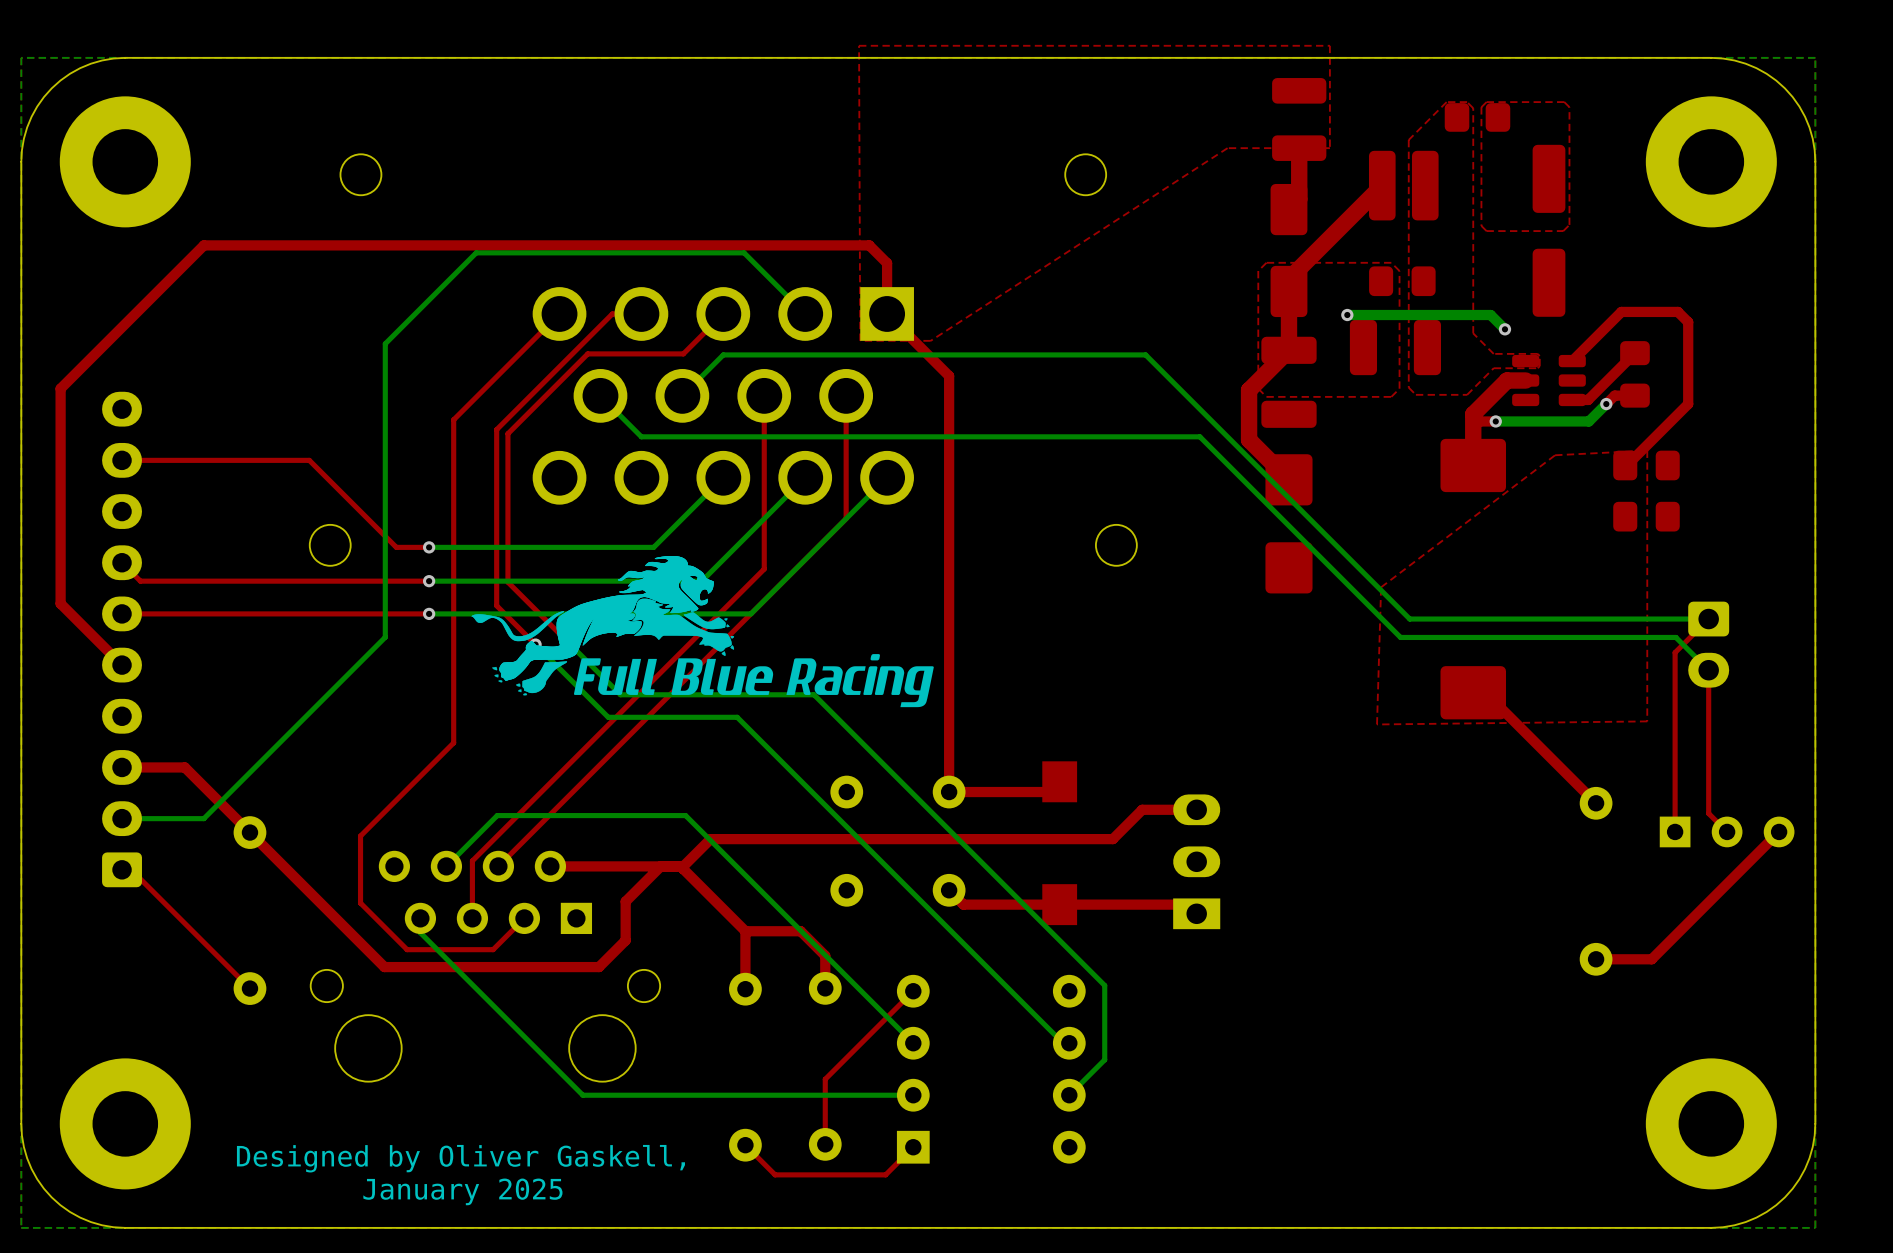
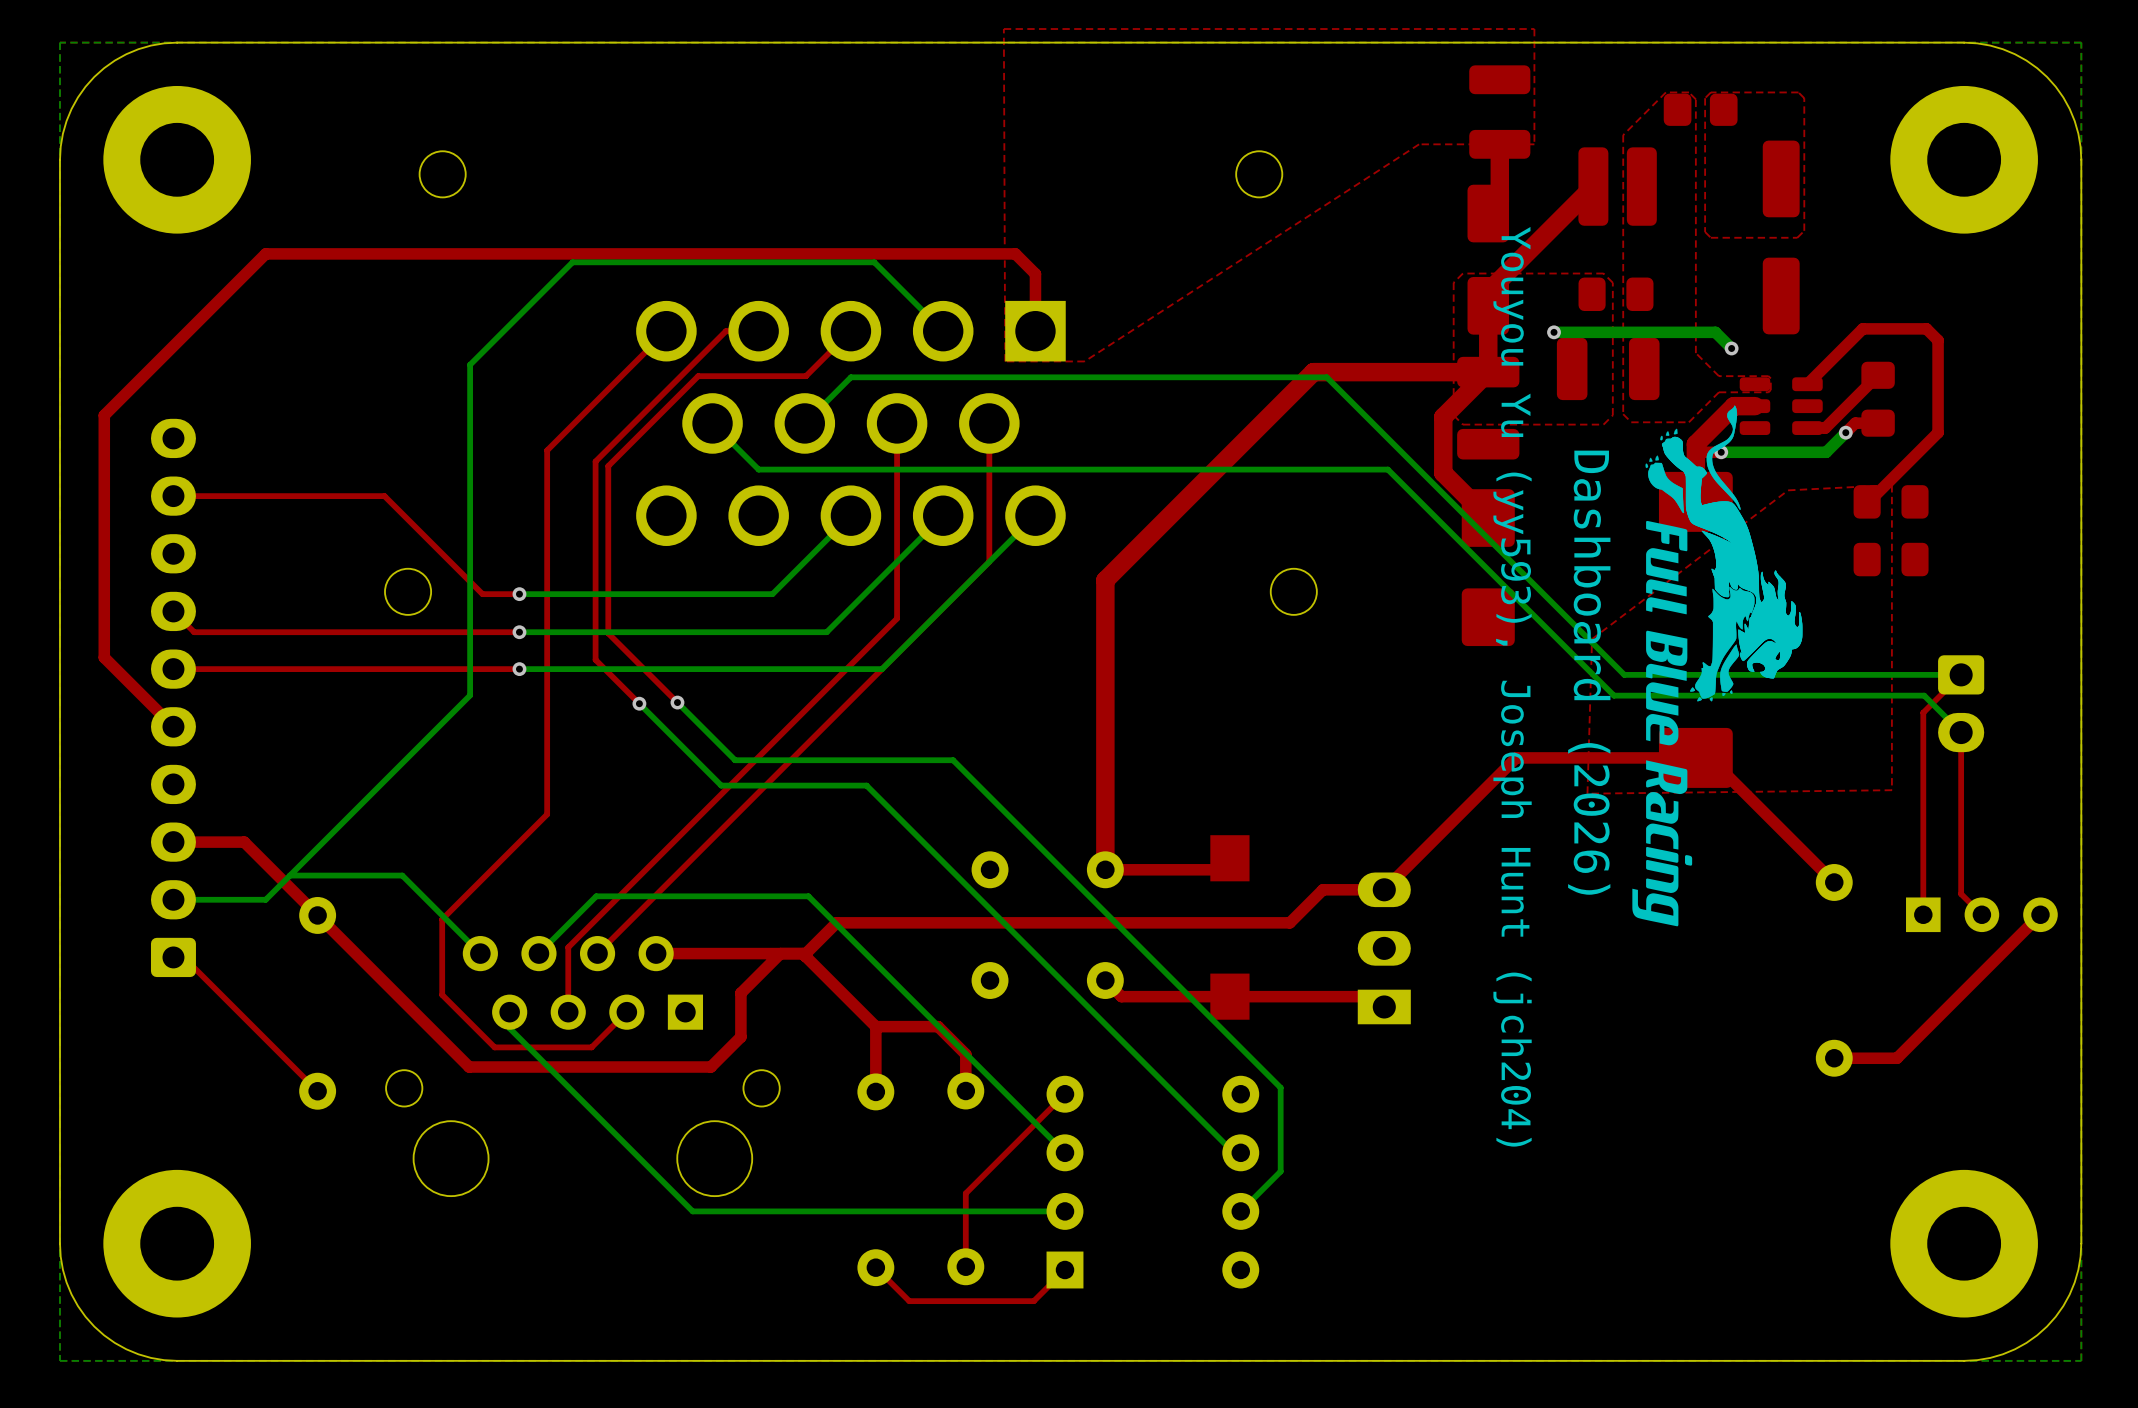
top track: (887, 313) (949, 376) (949, 535) -> (1488, 372) (1313, 372) (1105, 580)
top track width: thin (949, 535) (949, 792) -> thick (1105, 580) (1105, 869)
drawing: [471, 556, 934, 708] -> none
Dashboard (2026): none -> (1717, 665)
top track: none -> (1695, 757) (1516, 757) (1384, 889)
bottom track: none -> (289, 875) (402, 875) (480, 953)
text: Designed by Oliver Gaskell, (460, 1158) -> none
text: January 2025 (462, 1191) -> none

